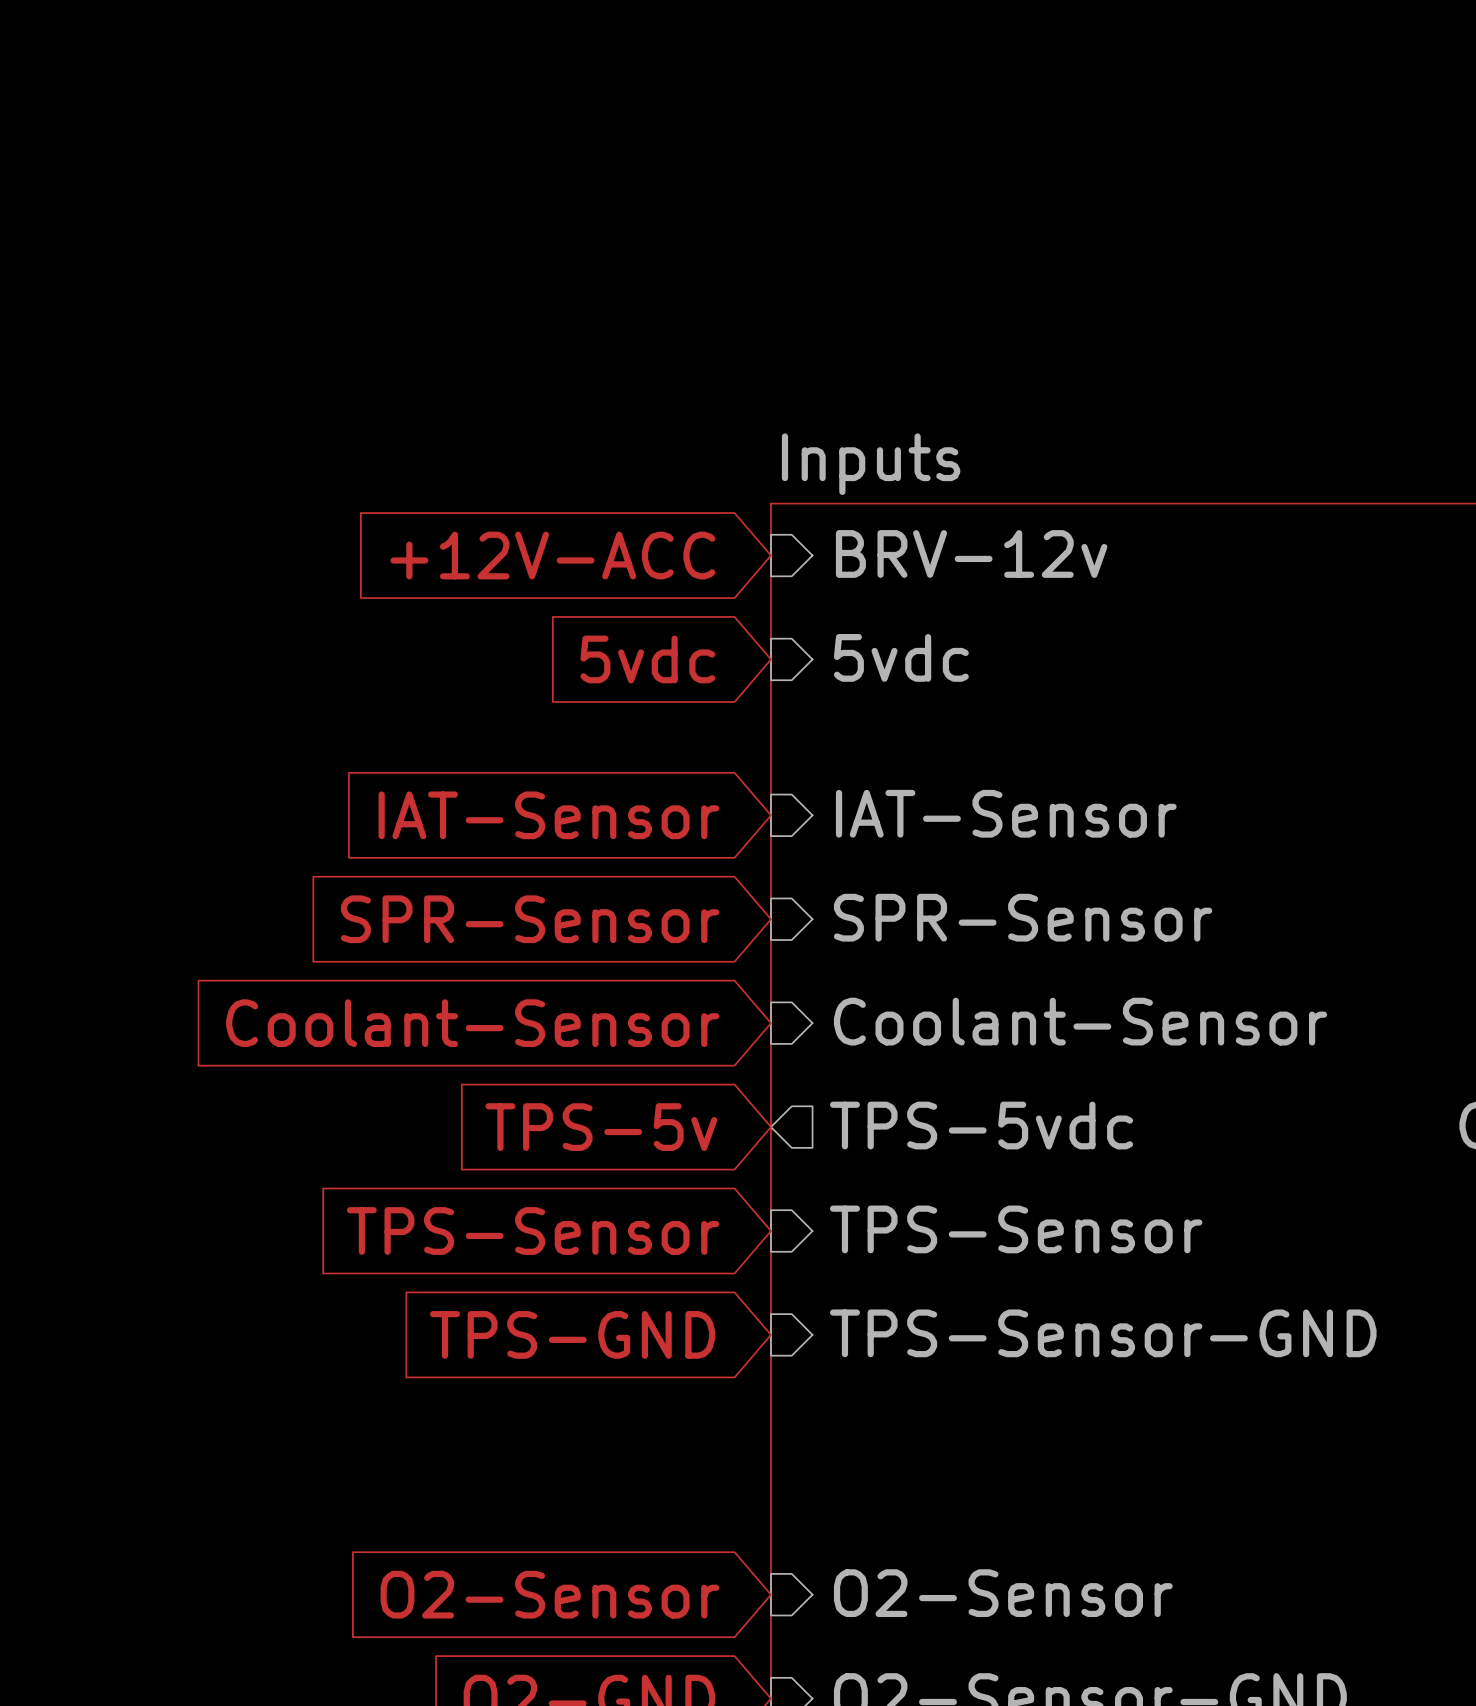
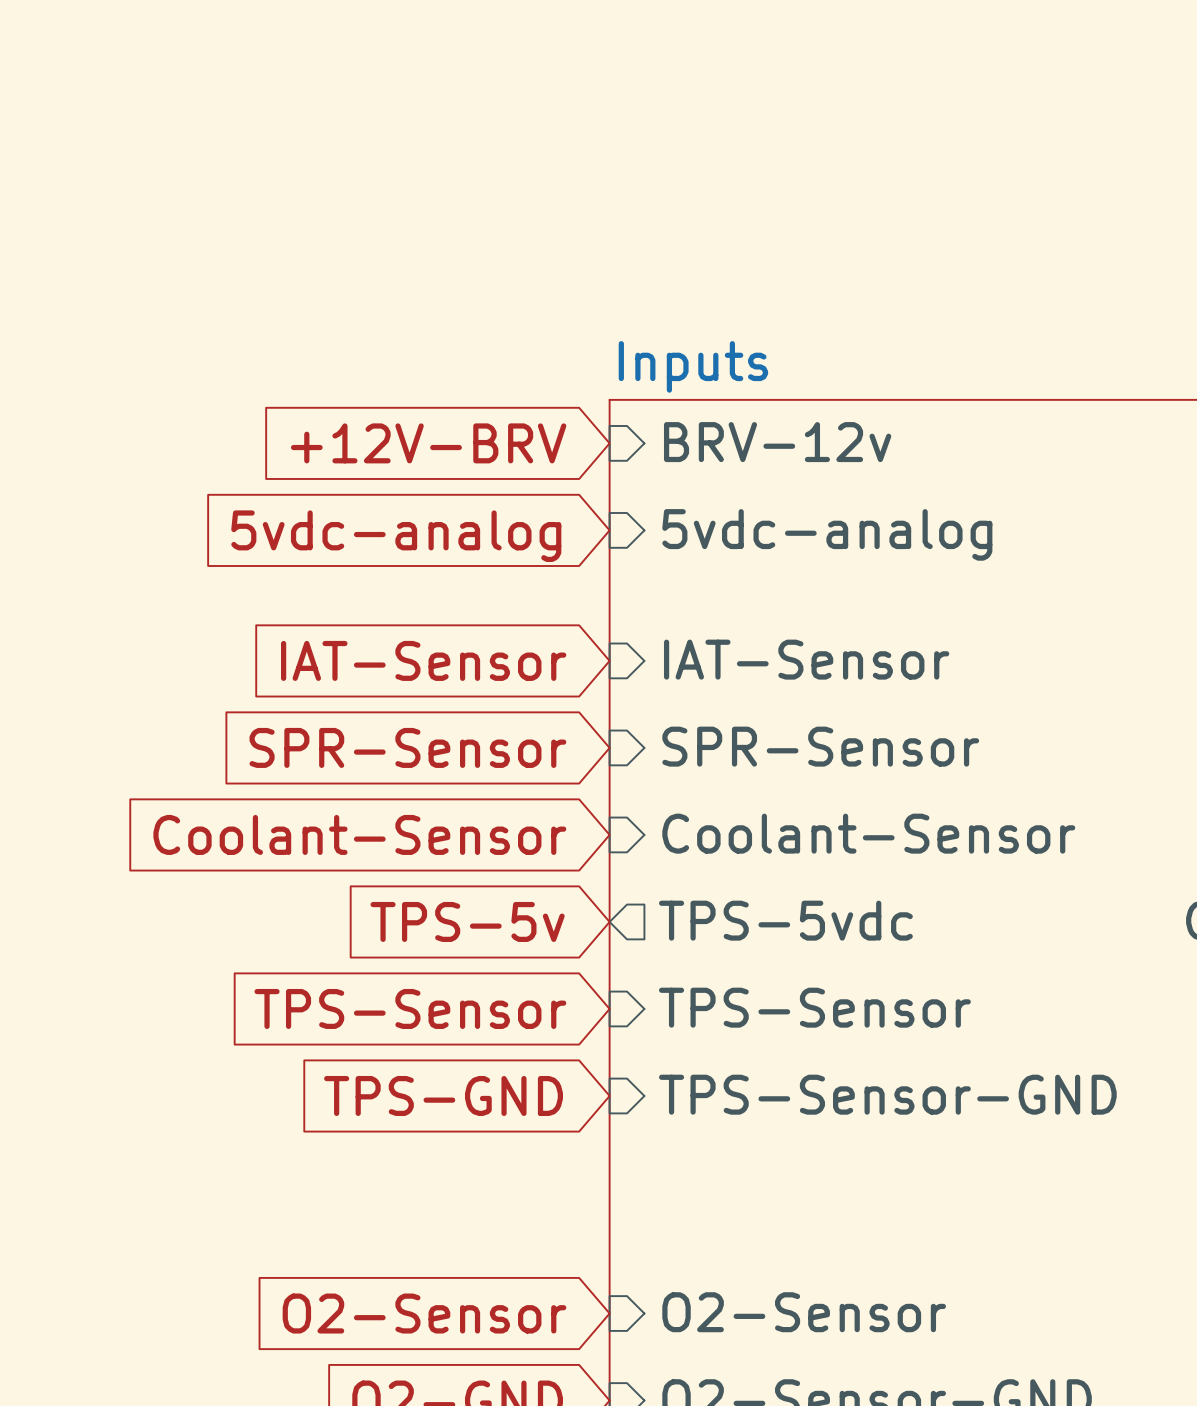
global label: +12V-ACC (552, 555) -> +12V-BRV (428, 443)
sheet pin: 5vdc (901, 657) -> 5vdc-analog (827, 534)
global label: 5vdc (647, 659) -> 5vdc-analog (396, 536)

